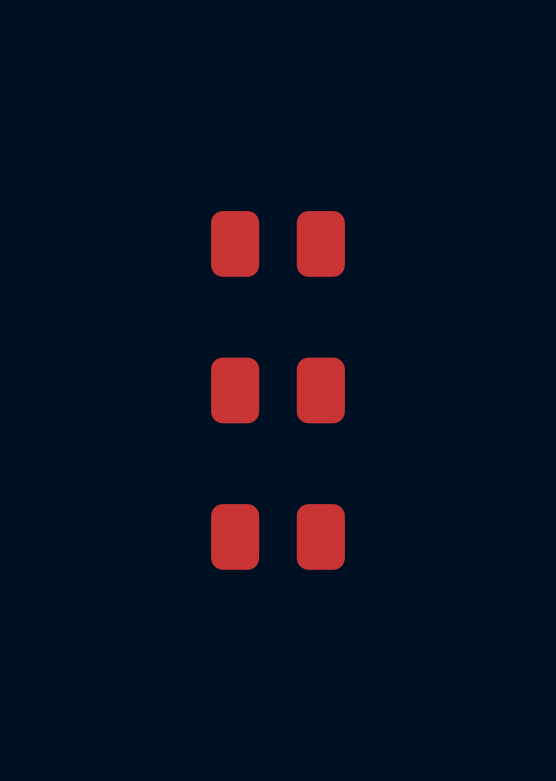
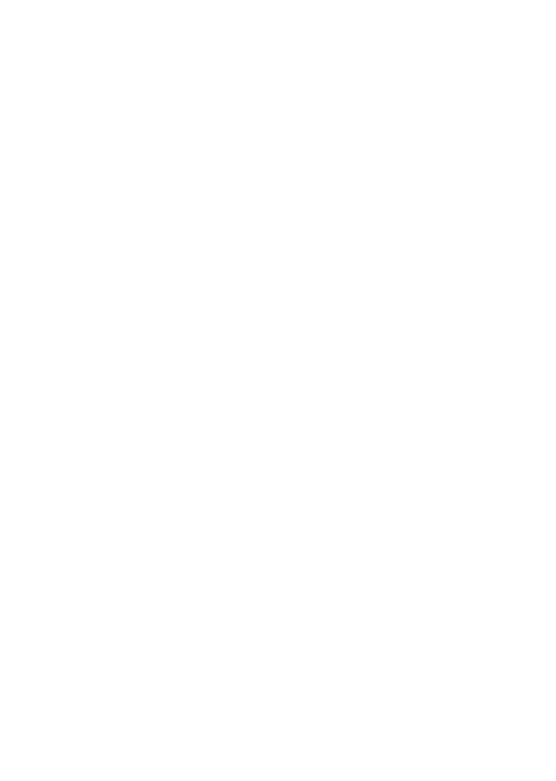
part: (277, 243) -> none
part: (277, 390) -> none
part: (277, 536) -> none

